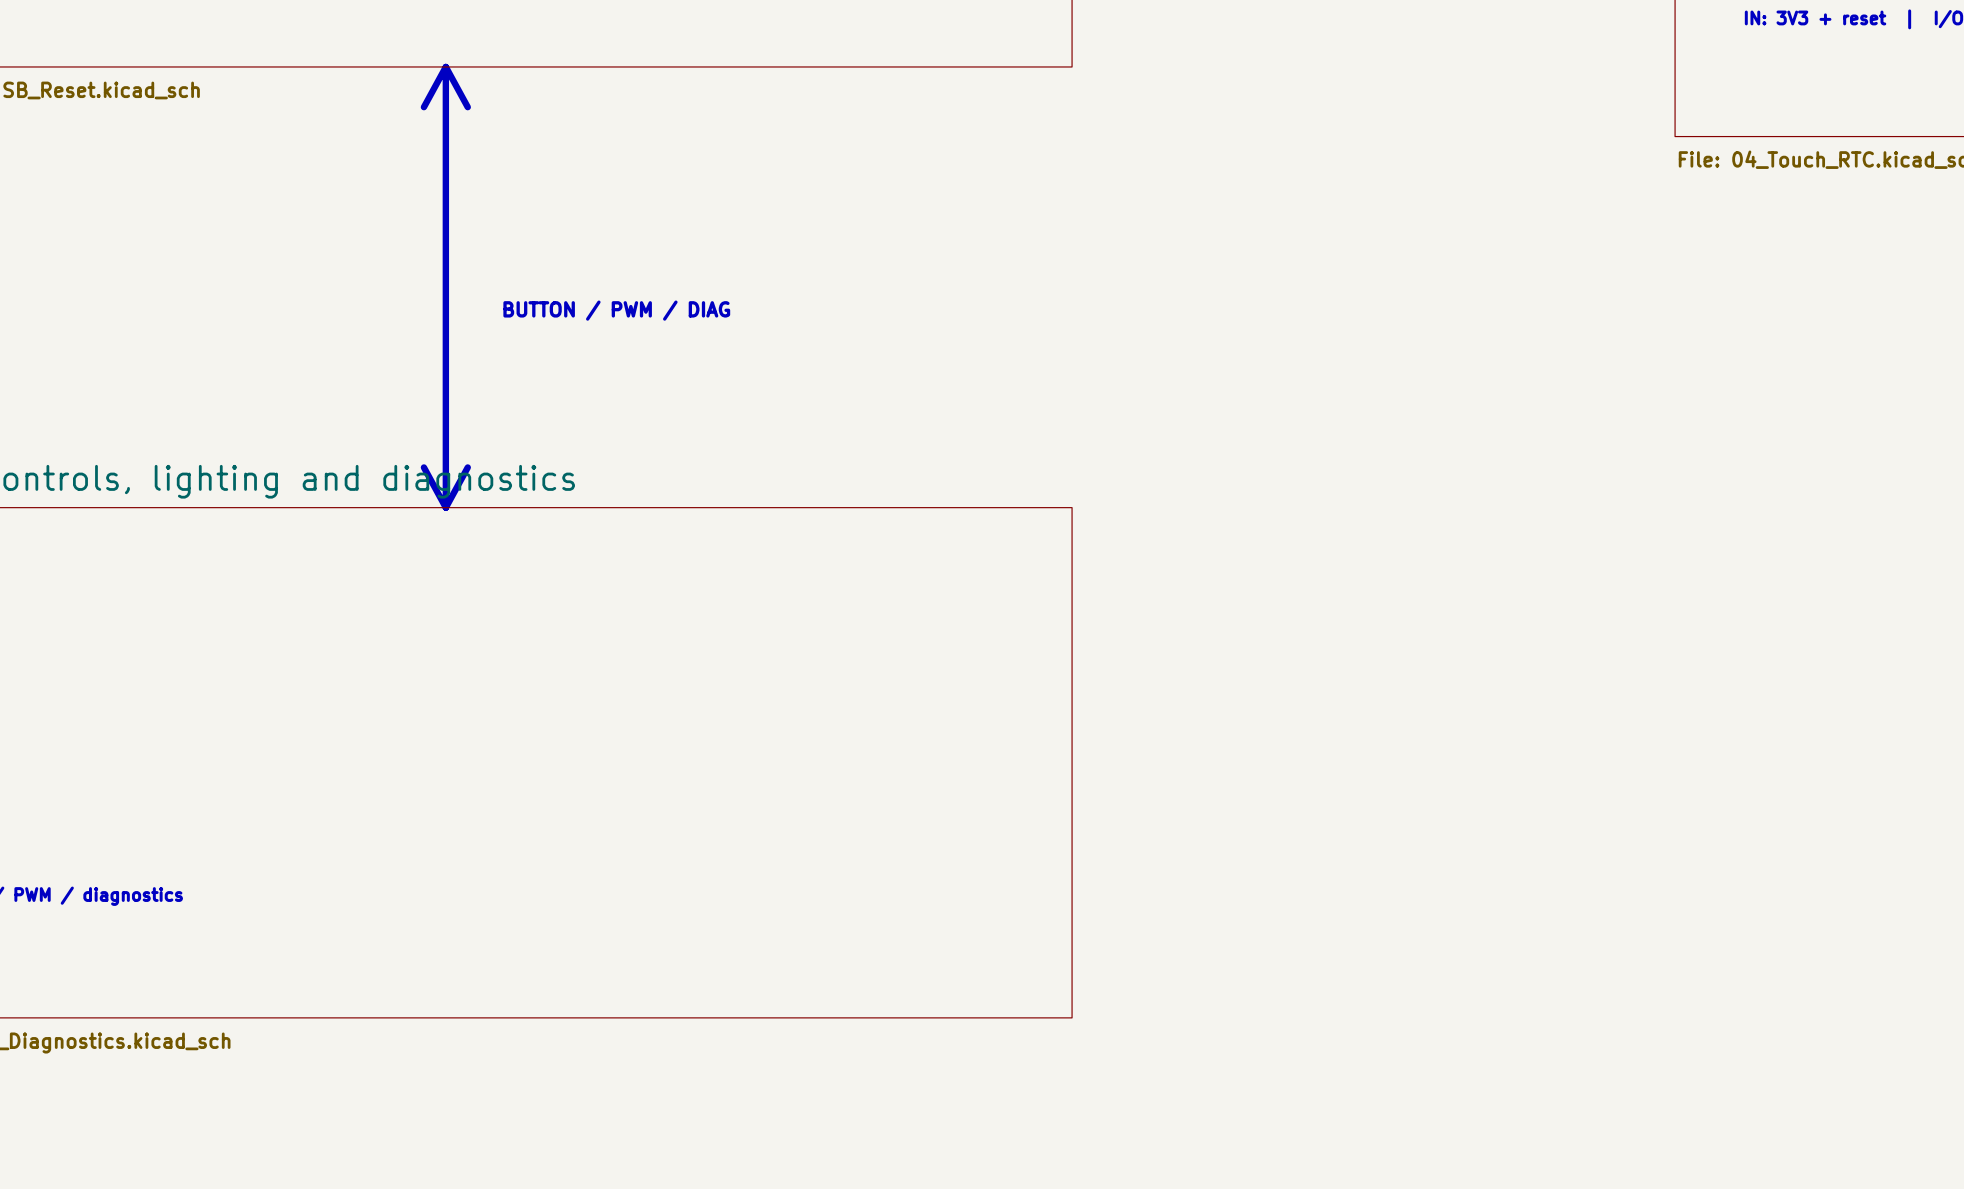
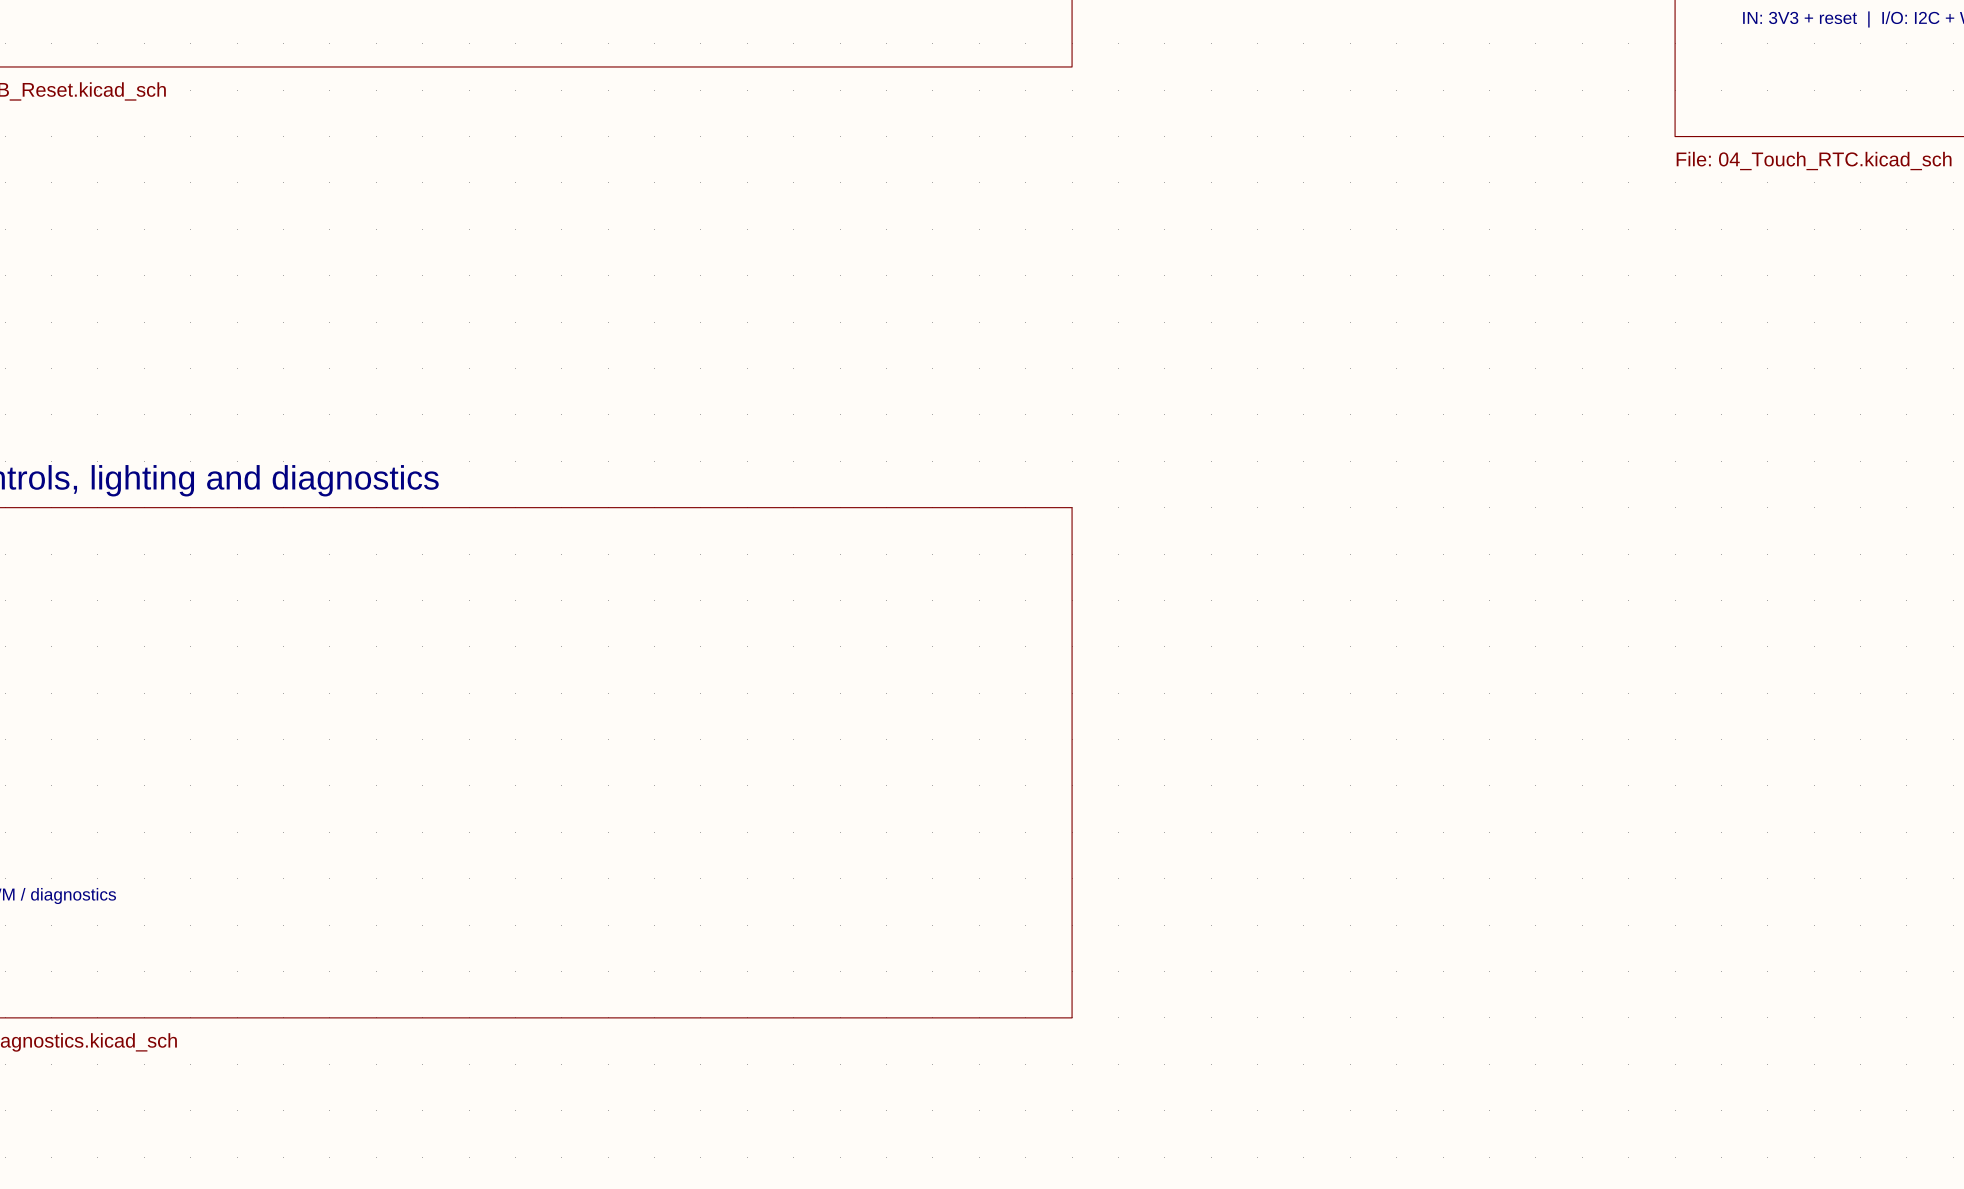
line: (445, 66) (445, 507) -> none
line: (445, 66) (423, 107) -> none
line: (445, 66) (467, 107) -> none
text: BUTTON / PWM / DIAG (616, 310) -> none
line: (423, 467) (445, 507) -> none
line: (467, 467) (445, 507) -> none

